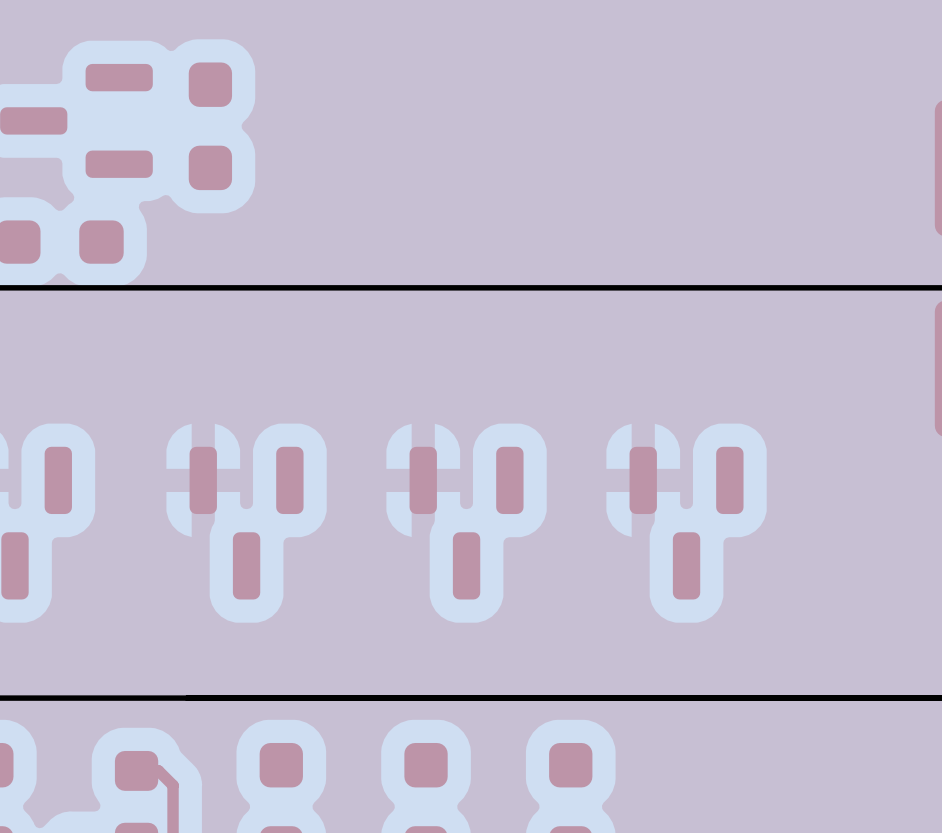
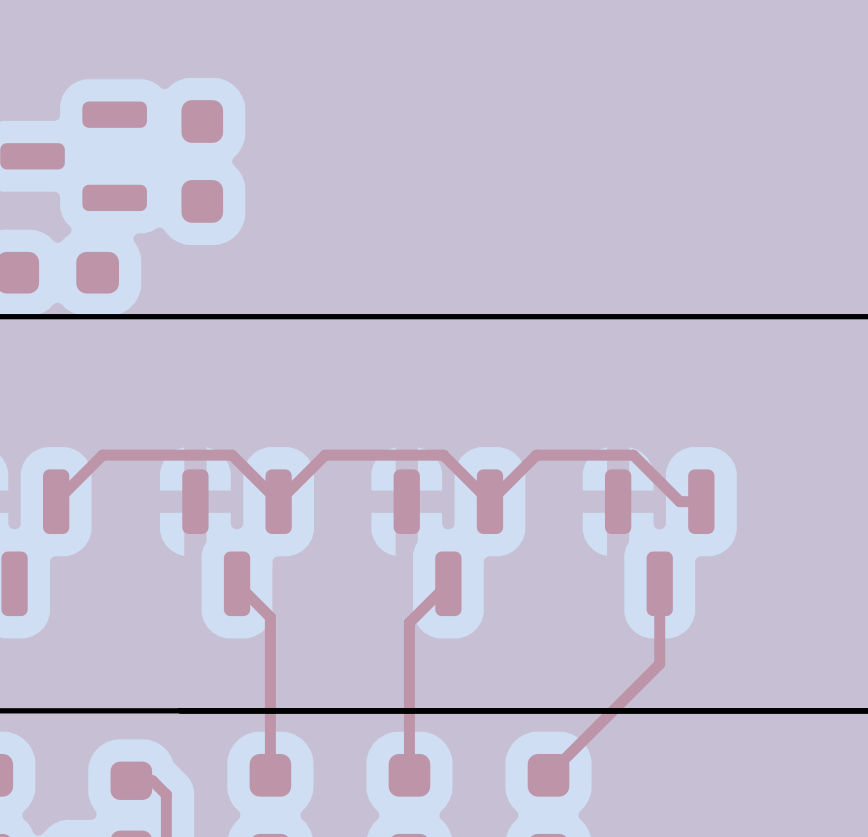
top track: none -> (701, 501) (679, 501) (633, 455) (536, 455) (489, 501) (443, 455) (325, 455) (278, 501) (232, 455) (102, 455) (56, 501)
top track: none -> (237, 583) (270, 617) (270, 775)
top track: none -> (448, 583) (409, 622) (409, 775)
top track: none -> (659, 583) (659, 664) (548, 775)

